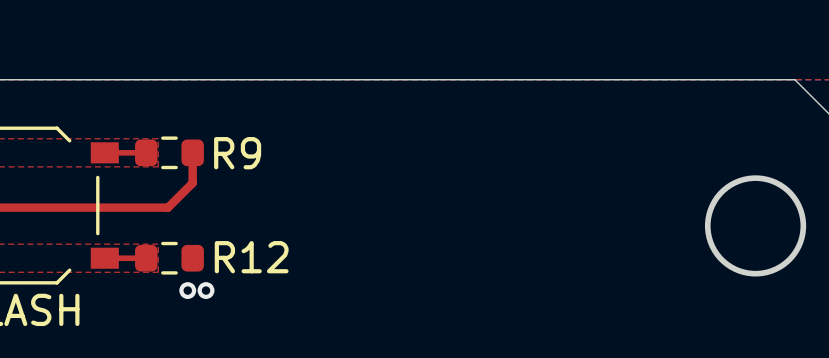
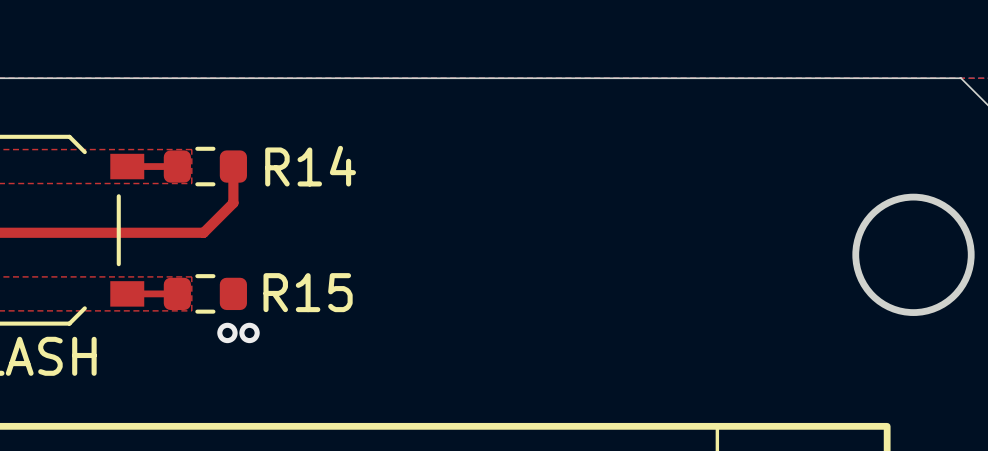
R9 name: R9 (237, 153) -> R14 (310, 166)
R12 name: R12 (251, 257) -> R15 (308, 292)

